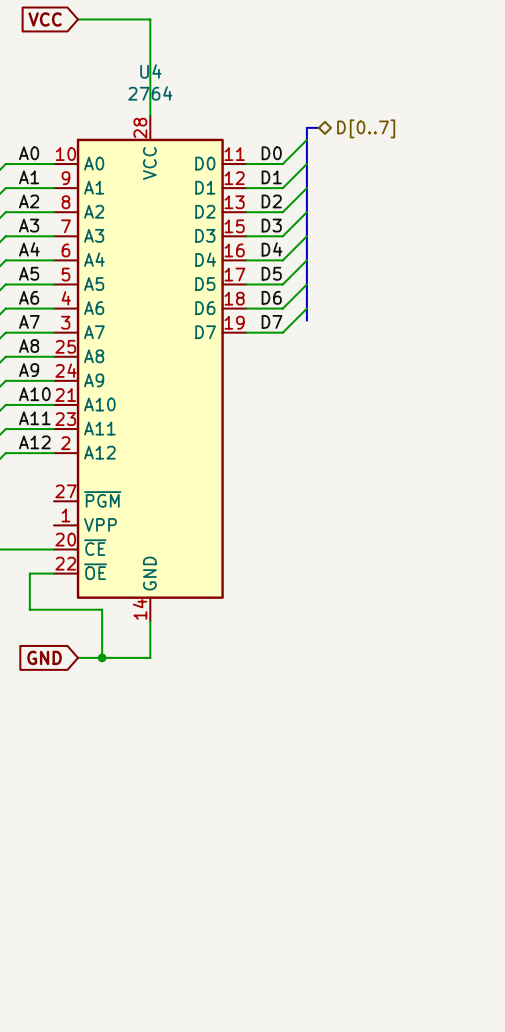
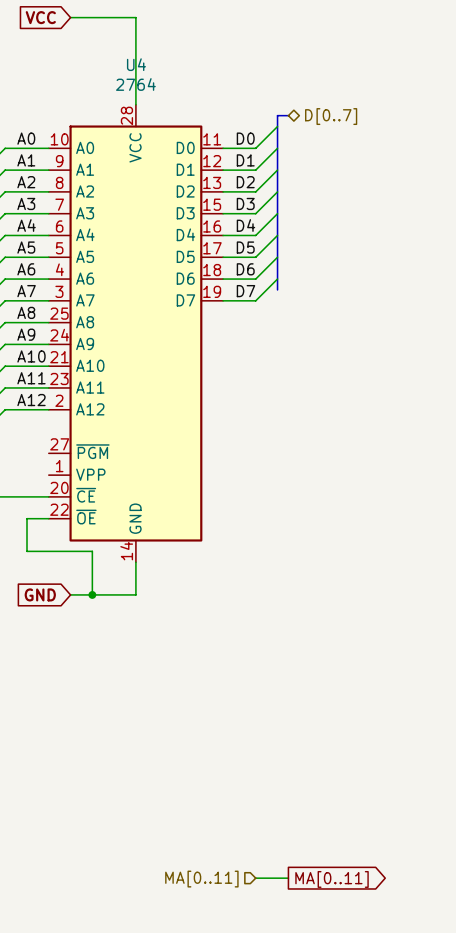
wire: none -> (255, 878) (288, 878)
hierarchical label: none -> MA[0..11] (201, 879)
global label: none -> MA[0..11] (332, 879)

